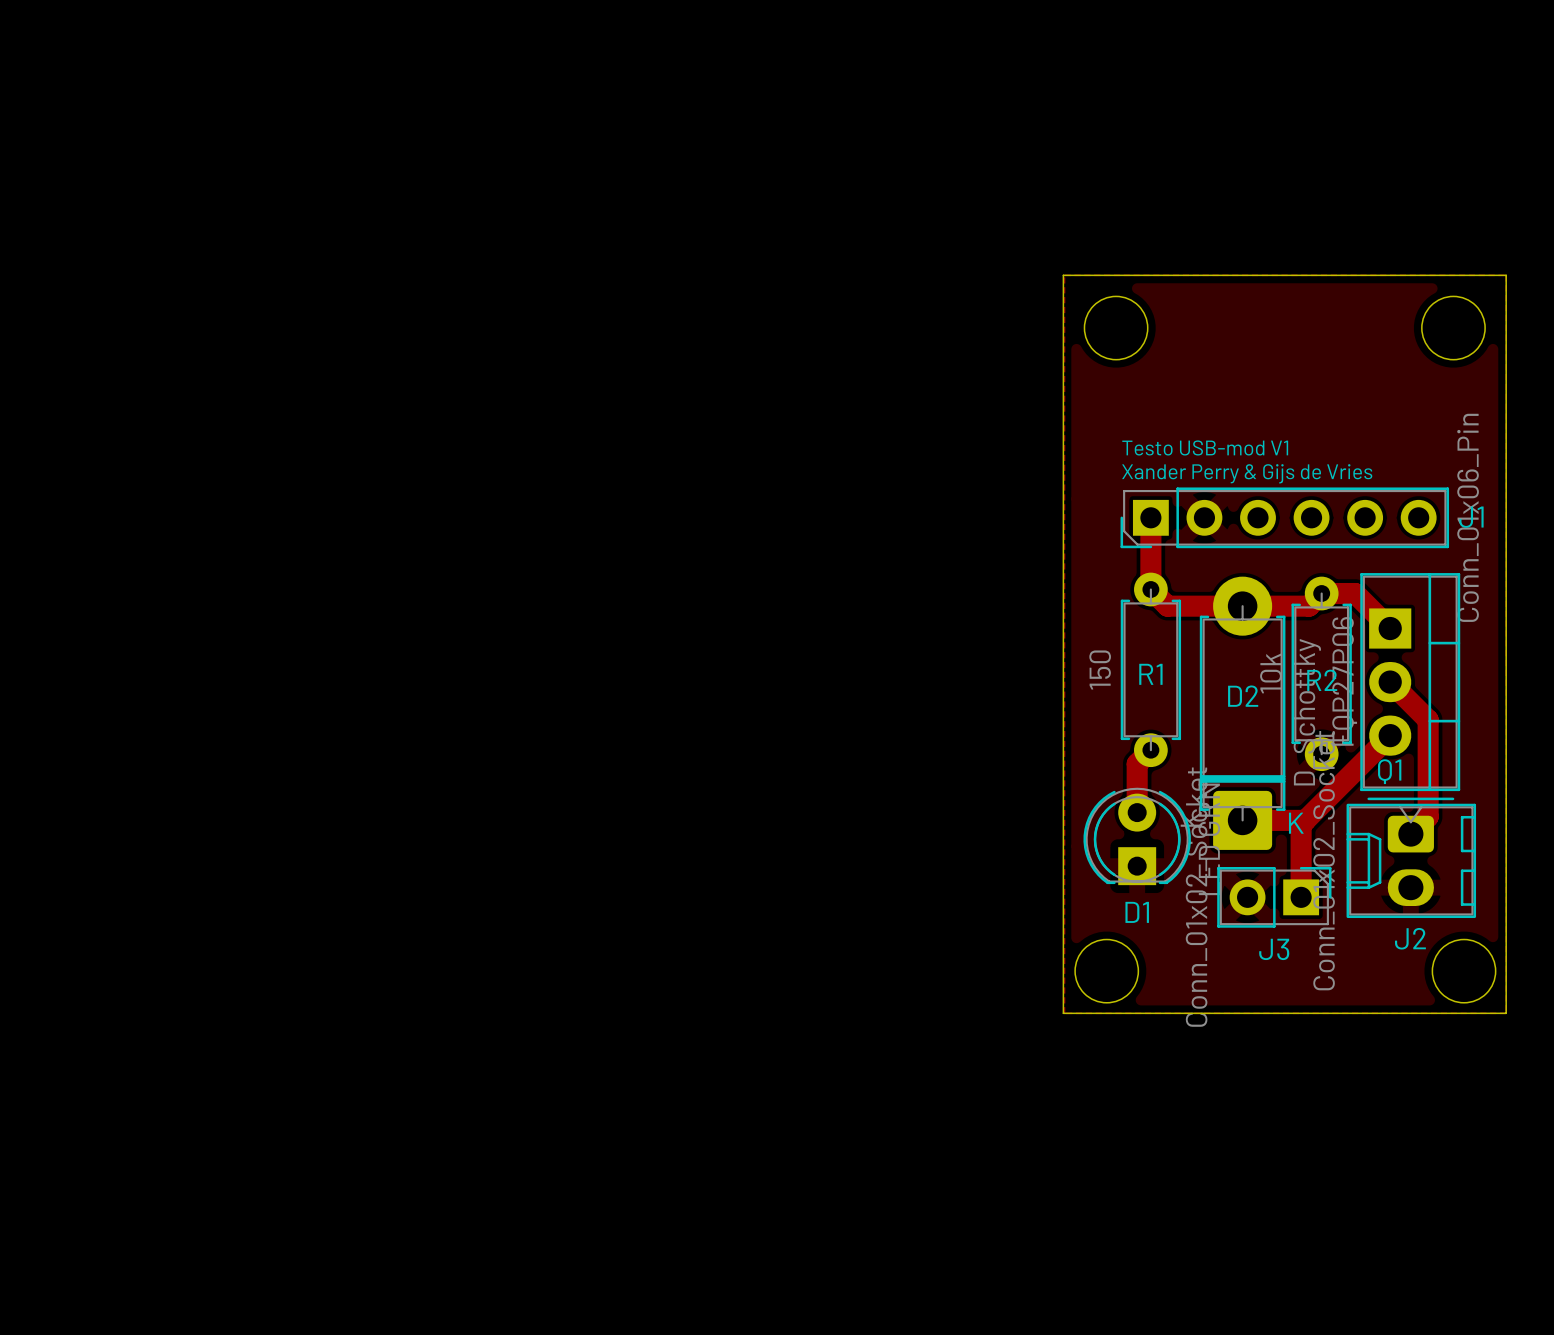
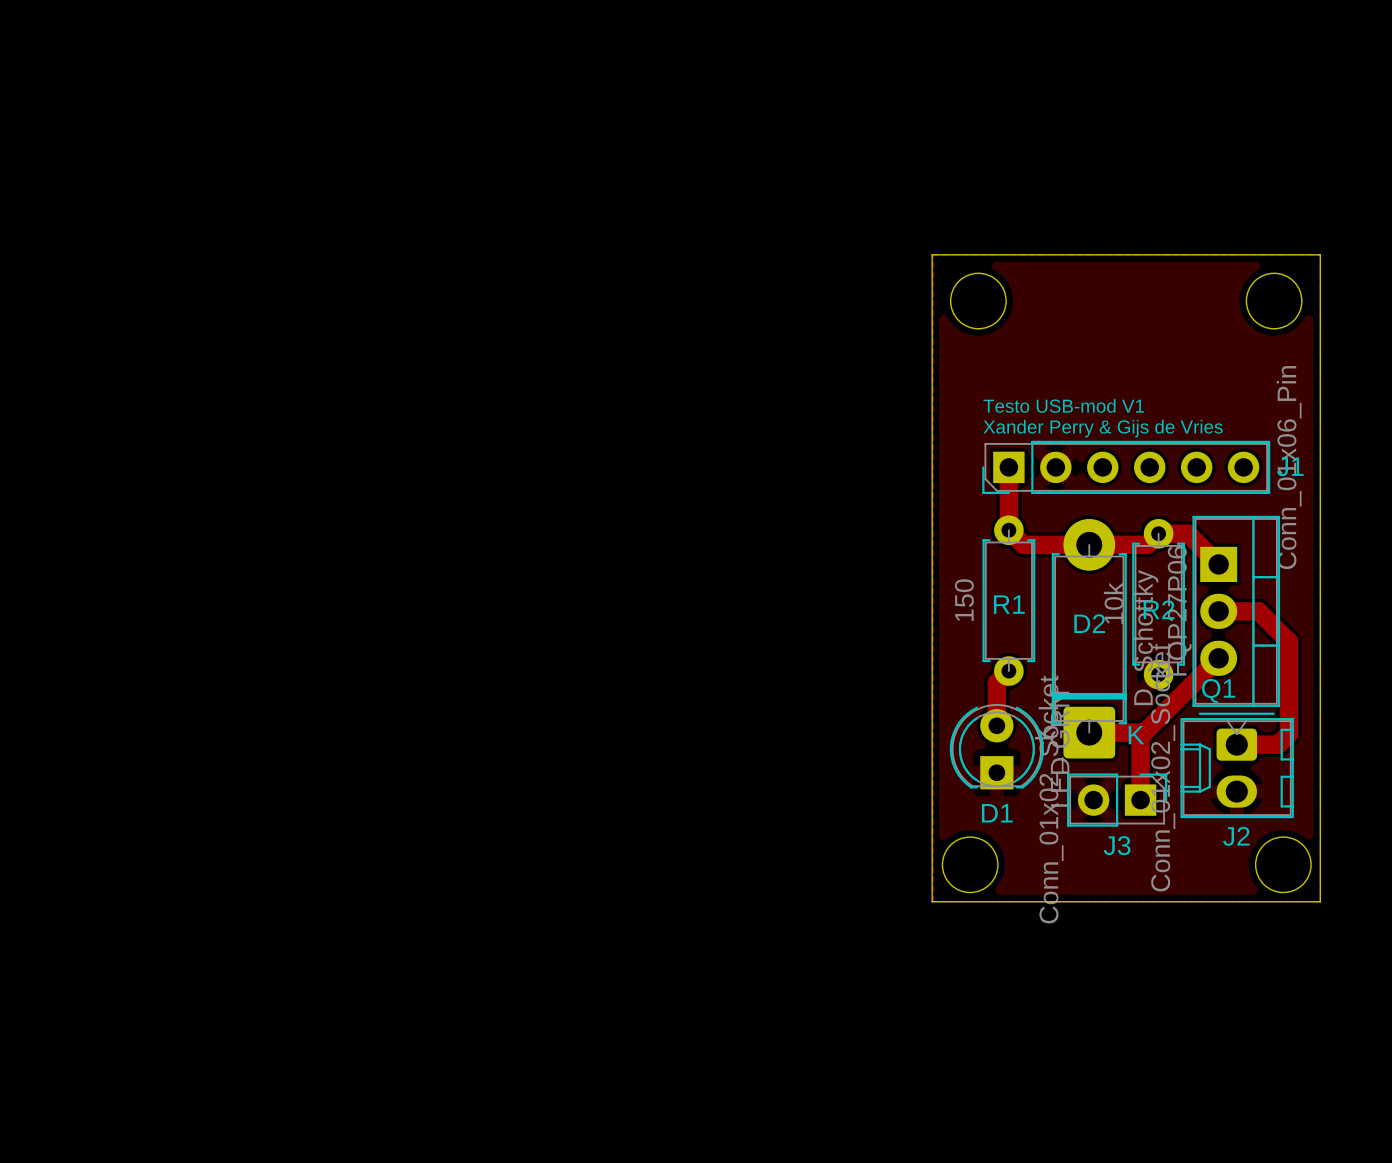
track: (1390, 682) (1428, 720) (1428, 816) (1410, 834) (1422, 822) -> (1218, 611) (1258, 611) (1288, 641) (1288, 734) (1278, 744) (1236, 744)

